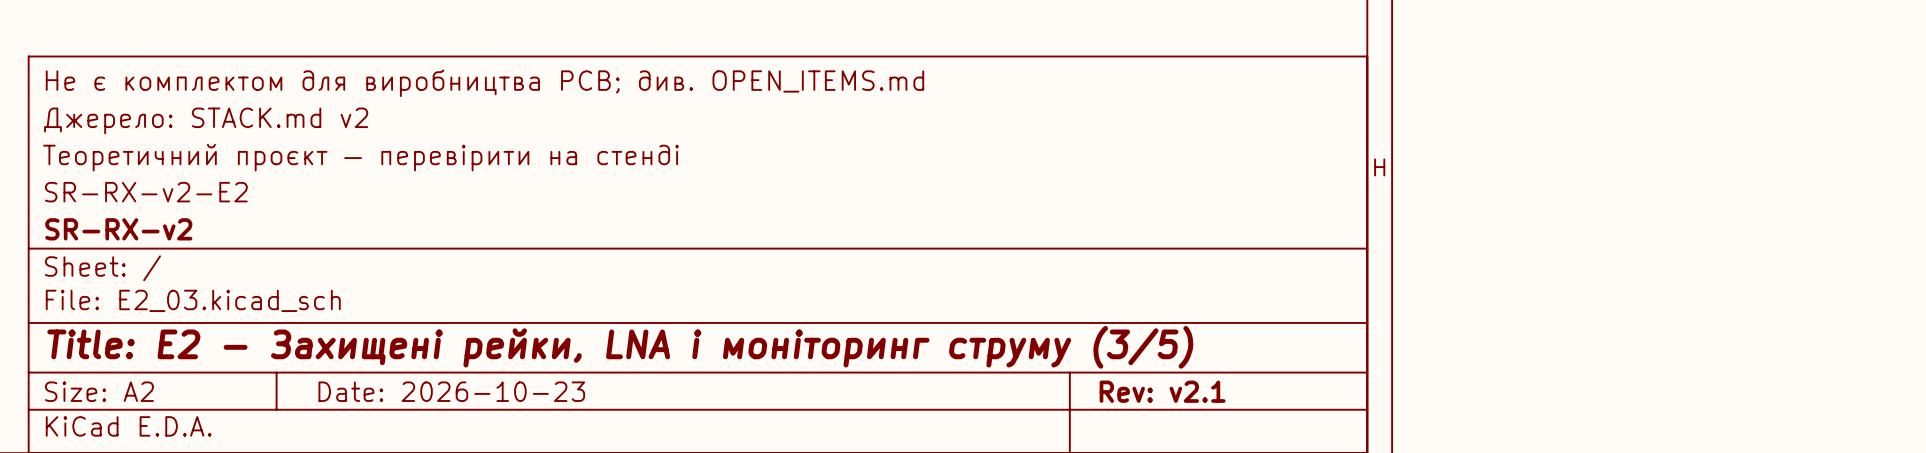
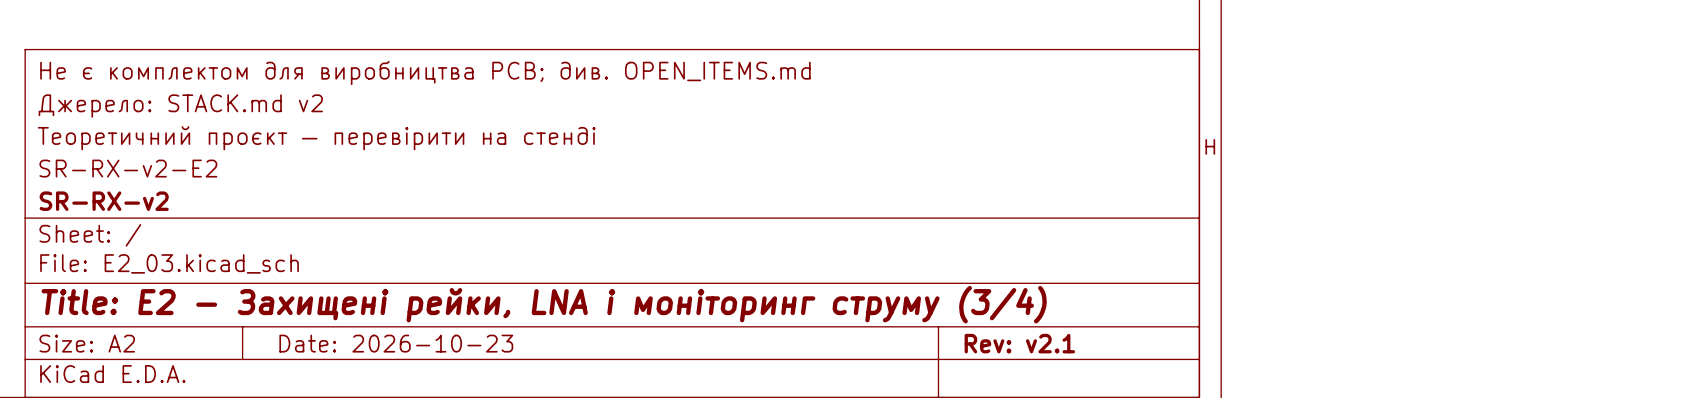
title block: Title: E2 - Захищені рейки, LNA і моніторинг струму (3/5) (620, 347) -> Title: E2 - Захищені рейки, LNA і моніторинг струму (3/4) (544, 304)

